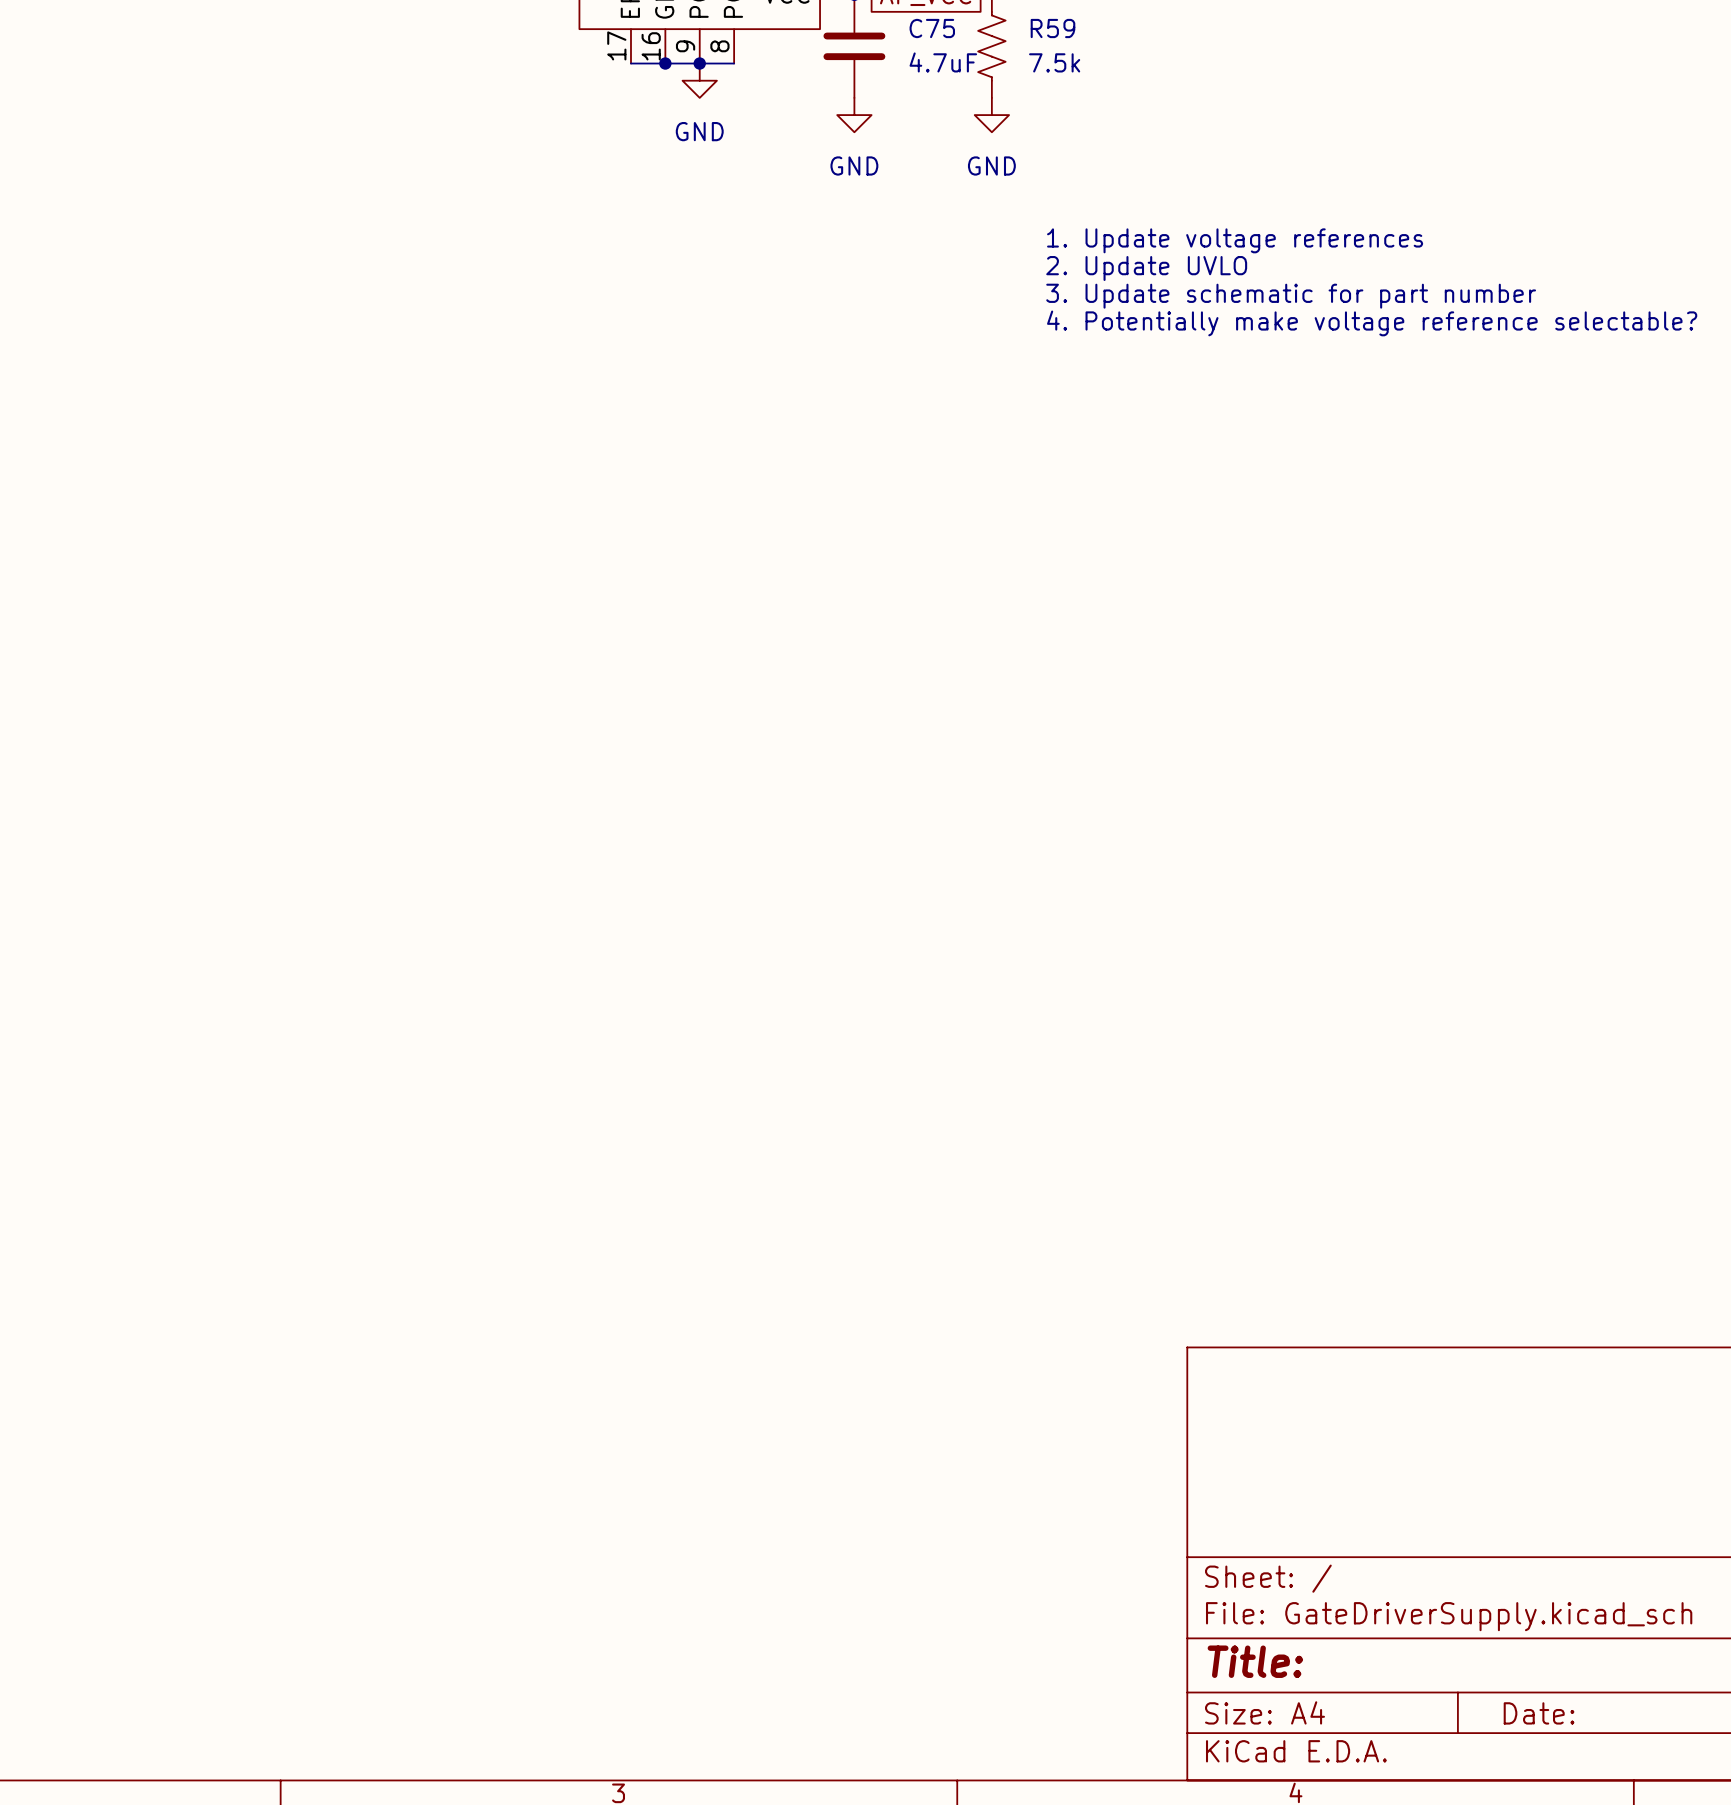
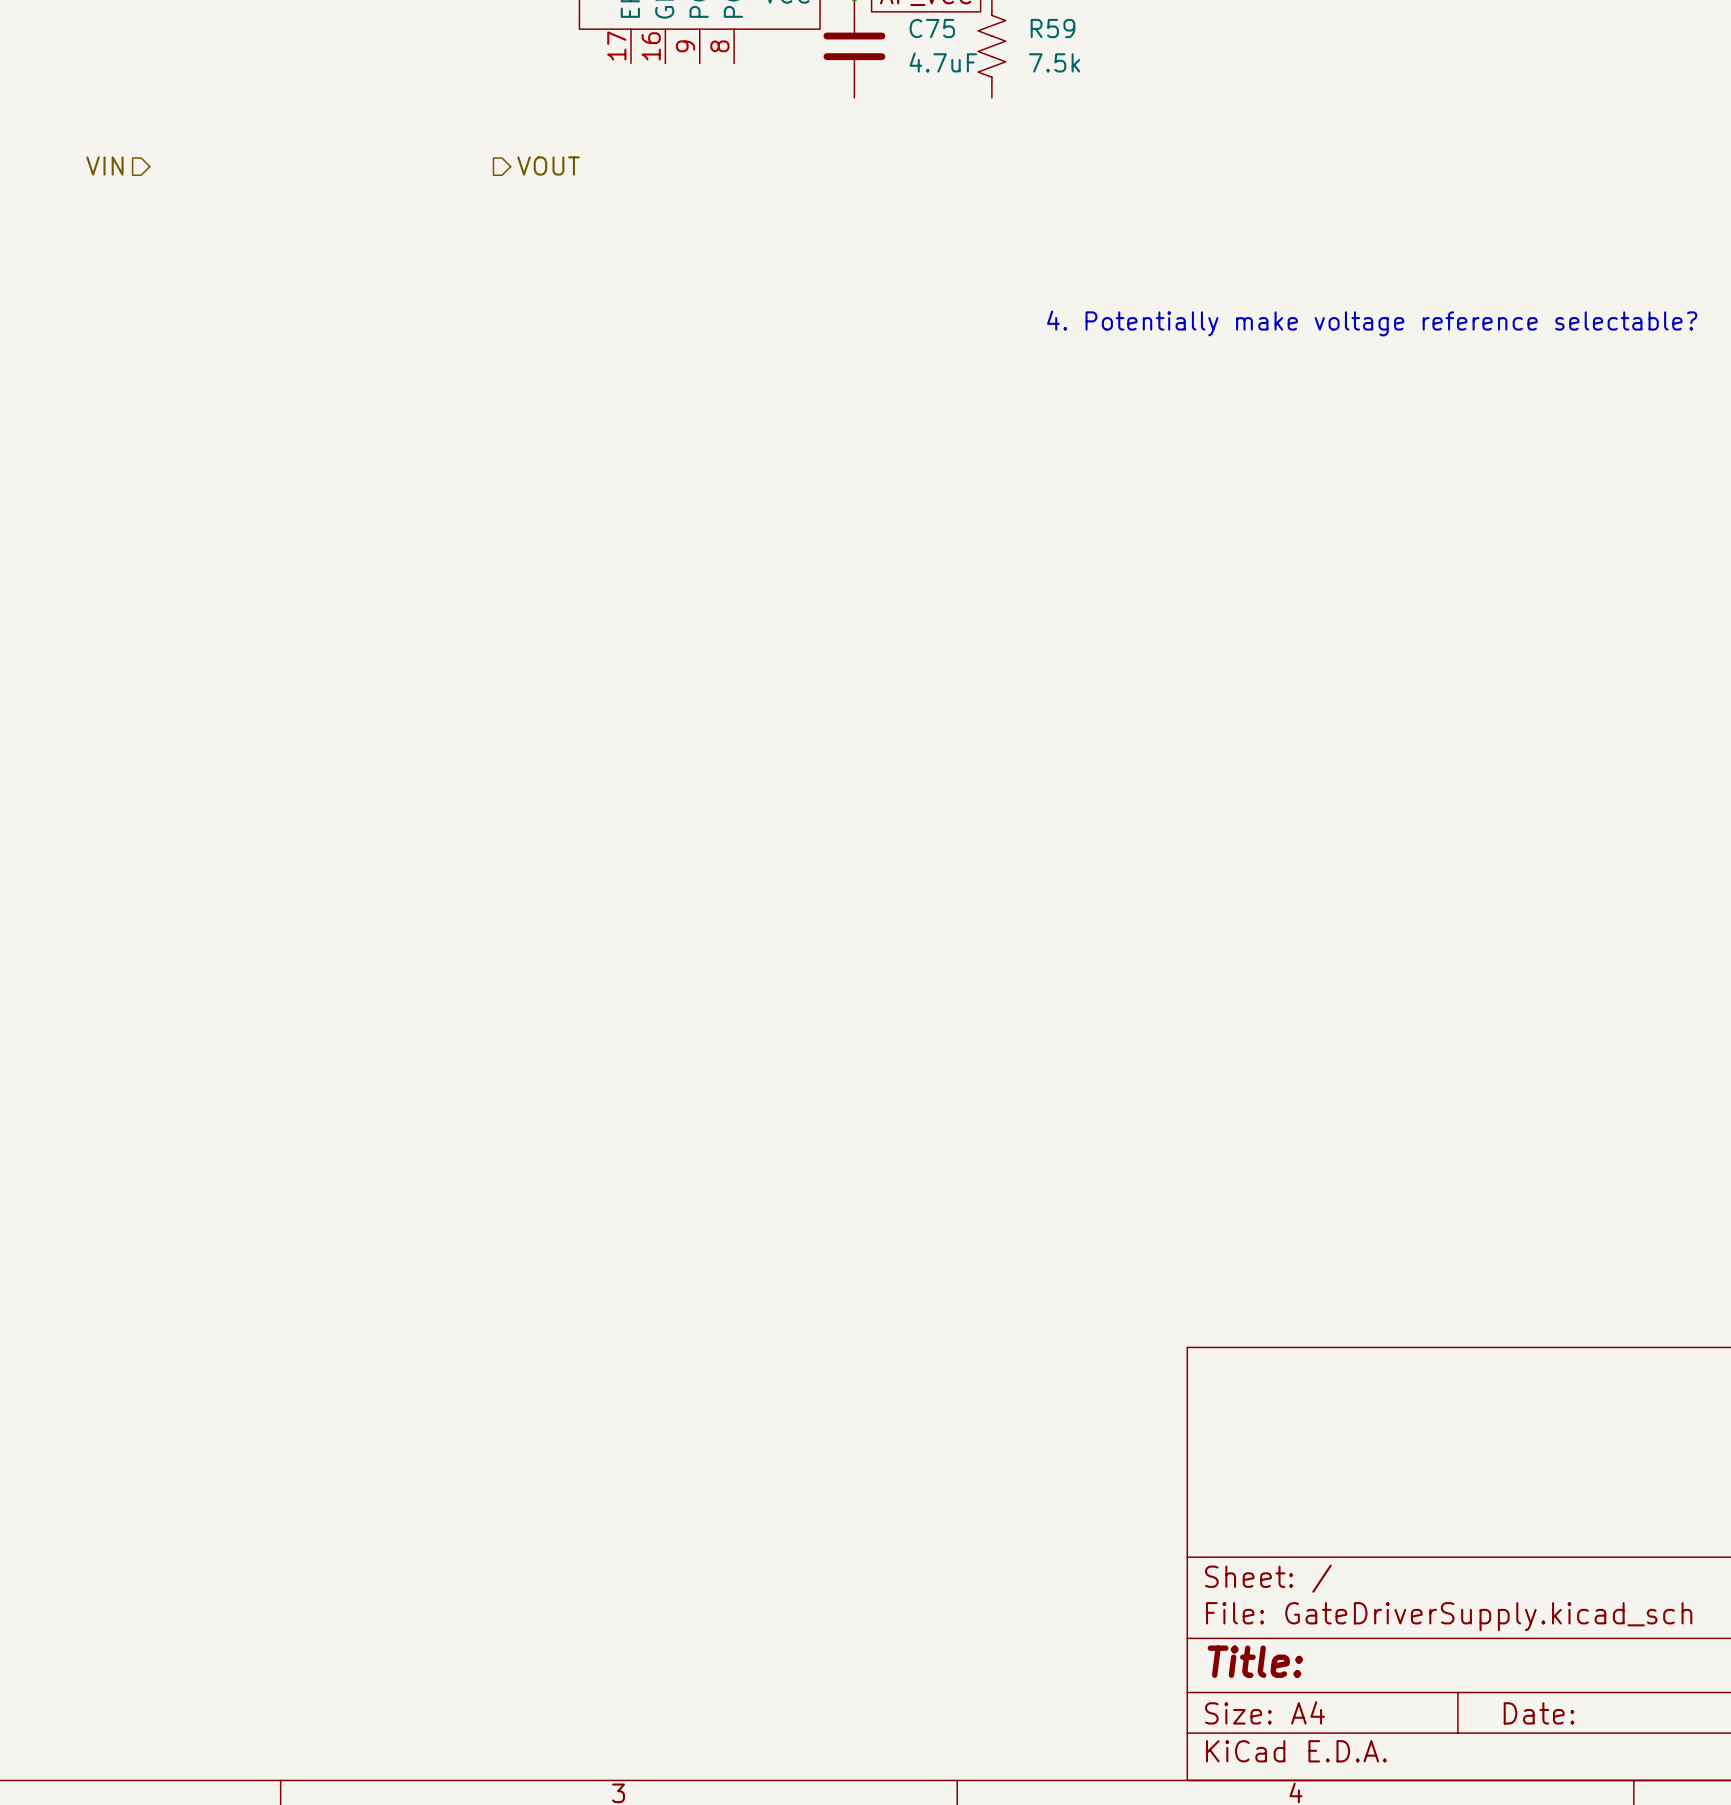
wire: (630, 63) (734, 63) -> none
junction: (665, 63) -> none
junction: (699, 63) -> none
power symbol: GND (699, 80) -> none
power symbol: GND (854, 115) -> none
power symbol: GND (991, 115) -> none
hierarchical label: none -> VIN (104, 165)
hierarchical label: none -> VOUT (548, 165)
text: 1. Update voltage references (1235, 240) -> none
text: 2. Update UVLO (1146, 268) -> none
text: 3. Update schematic for part number (1291, 296) -> none

